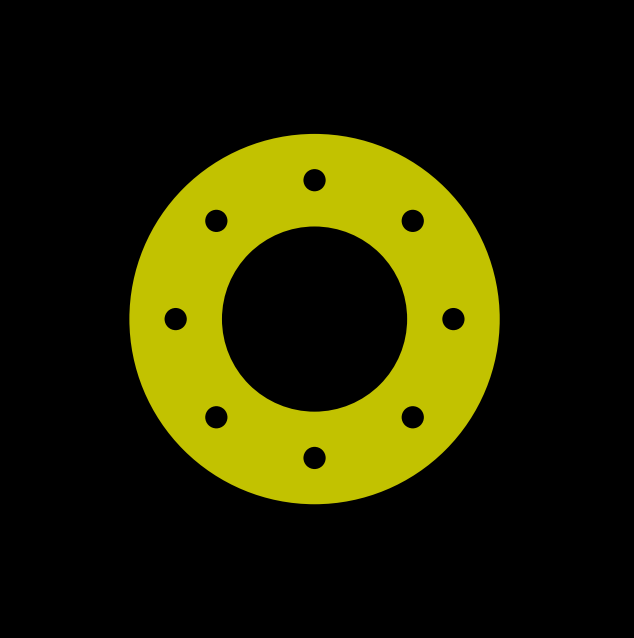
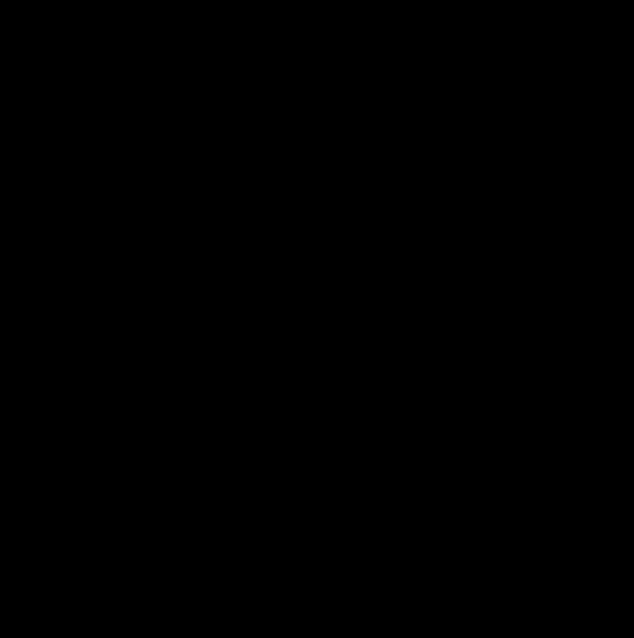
part: (314, 319) -> none

